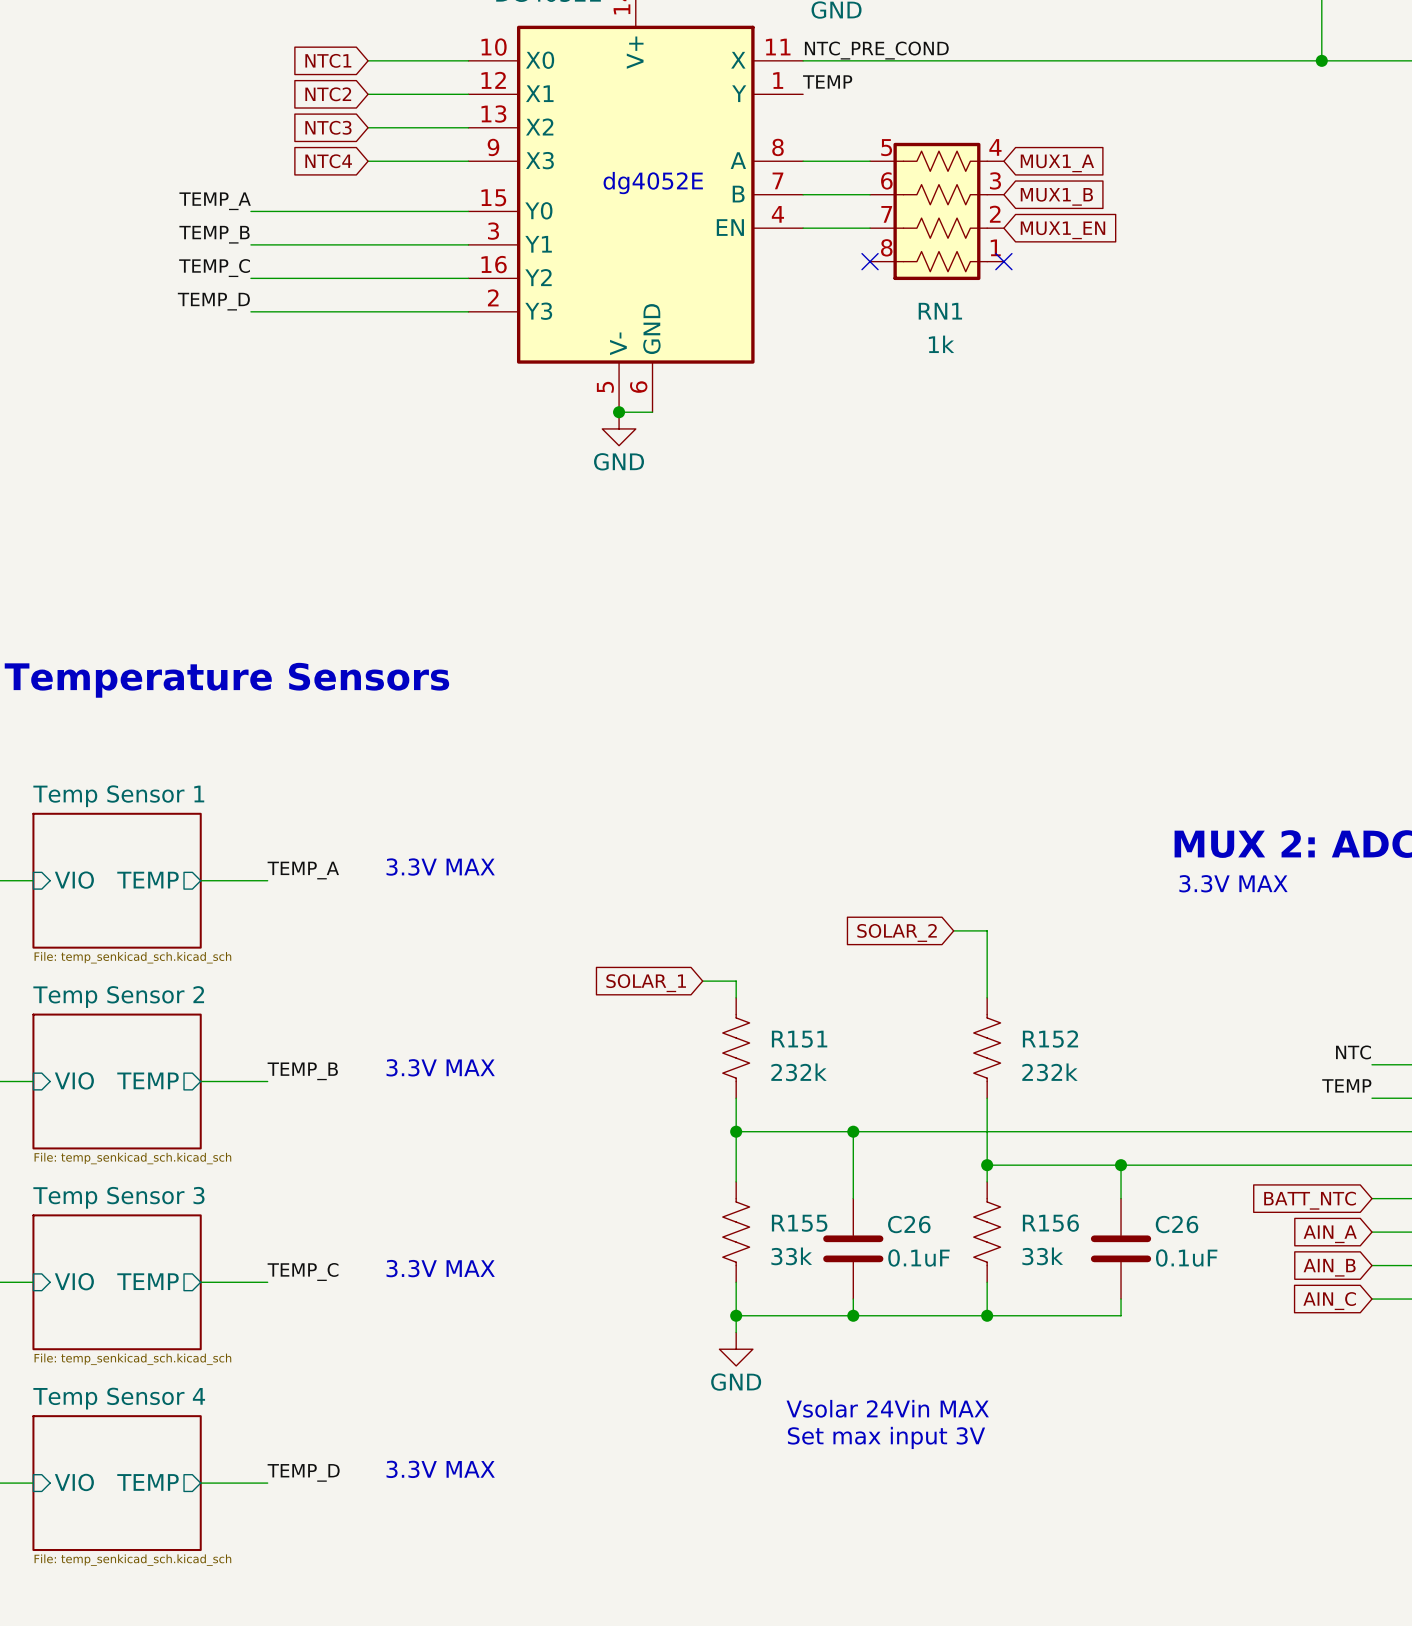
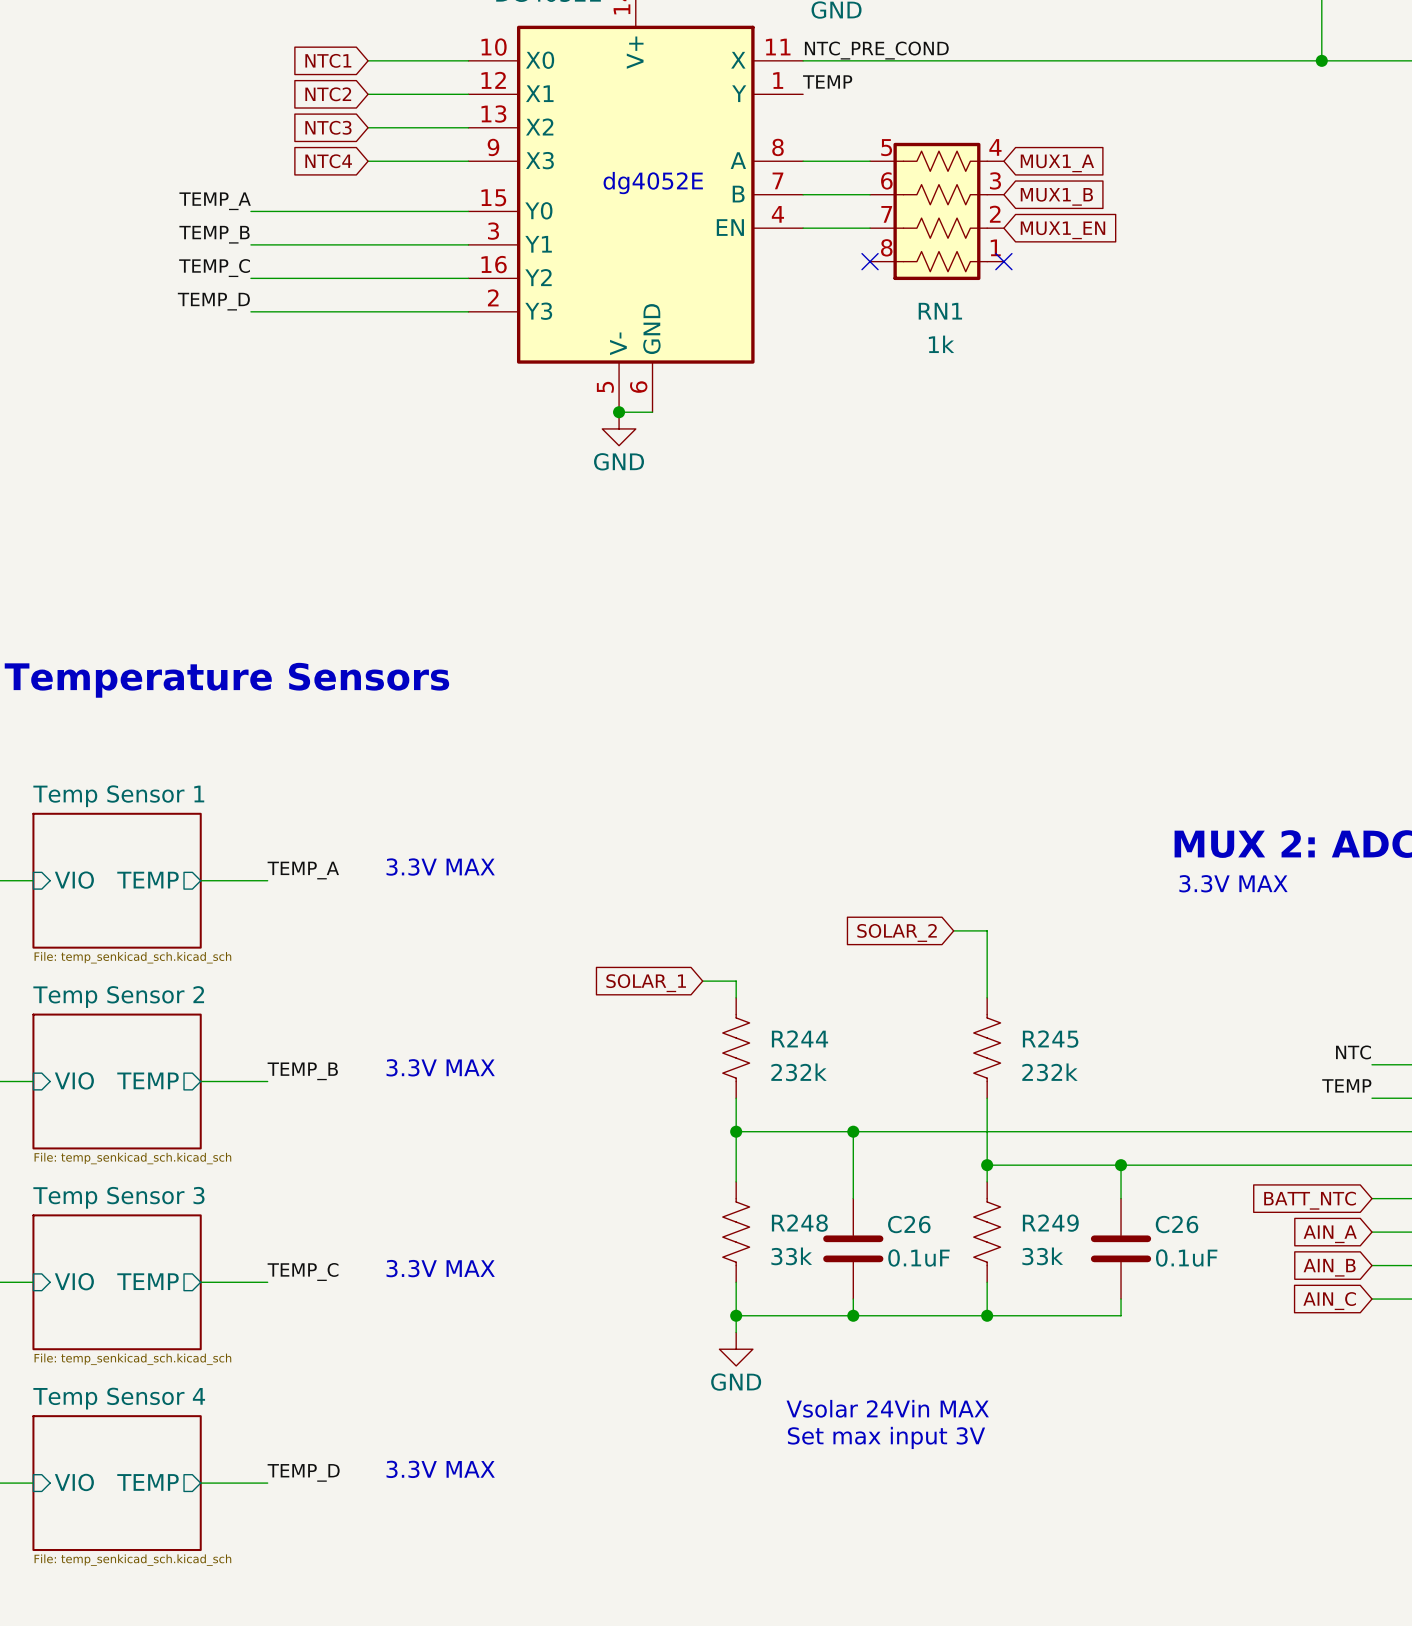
R151 name: R151 (799, 1039) -> R244 (800, 1038)
R152 name: R152 (1050, 1039) -> R245 (1050, 1039)
R155 name: R155 (799, 1223) -> R248 (799, 1223)
R156 name: R156 (1050, 1223) -> R249 (1050, 1223)

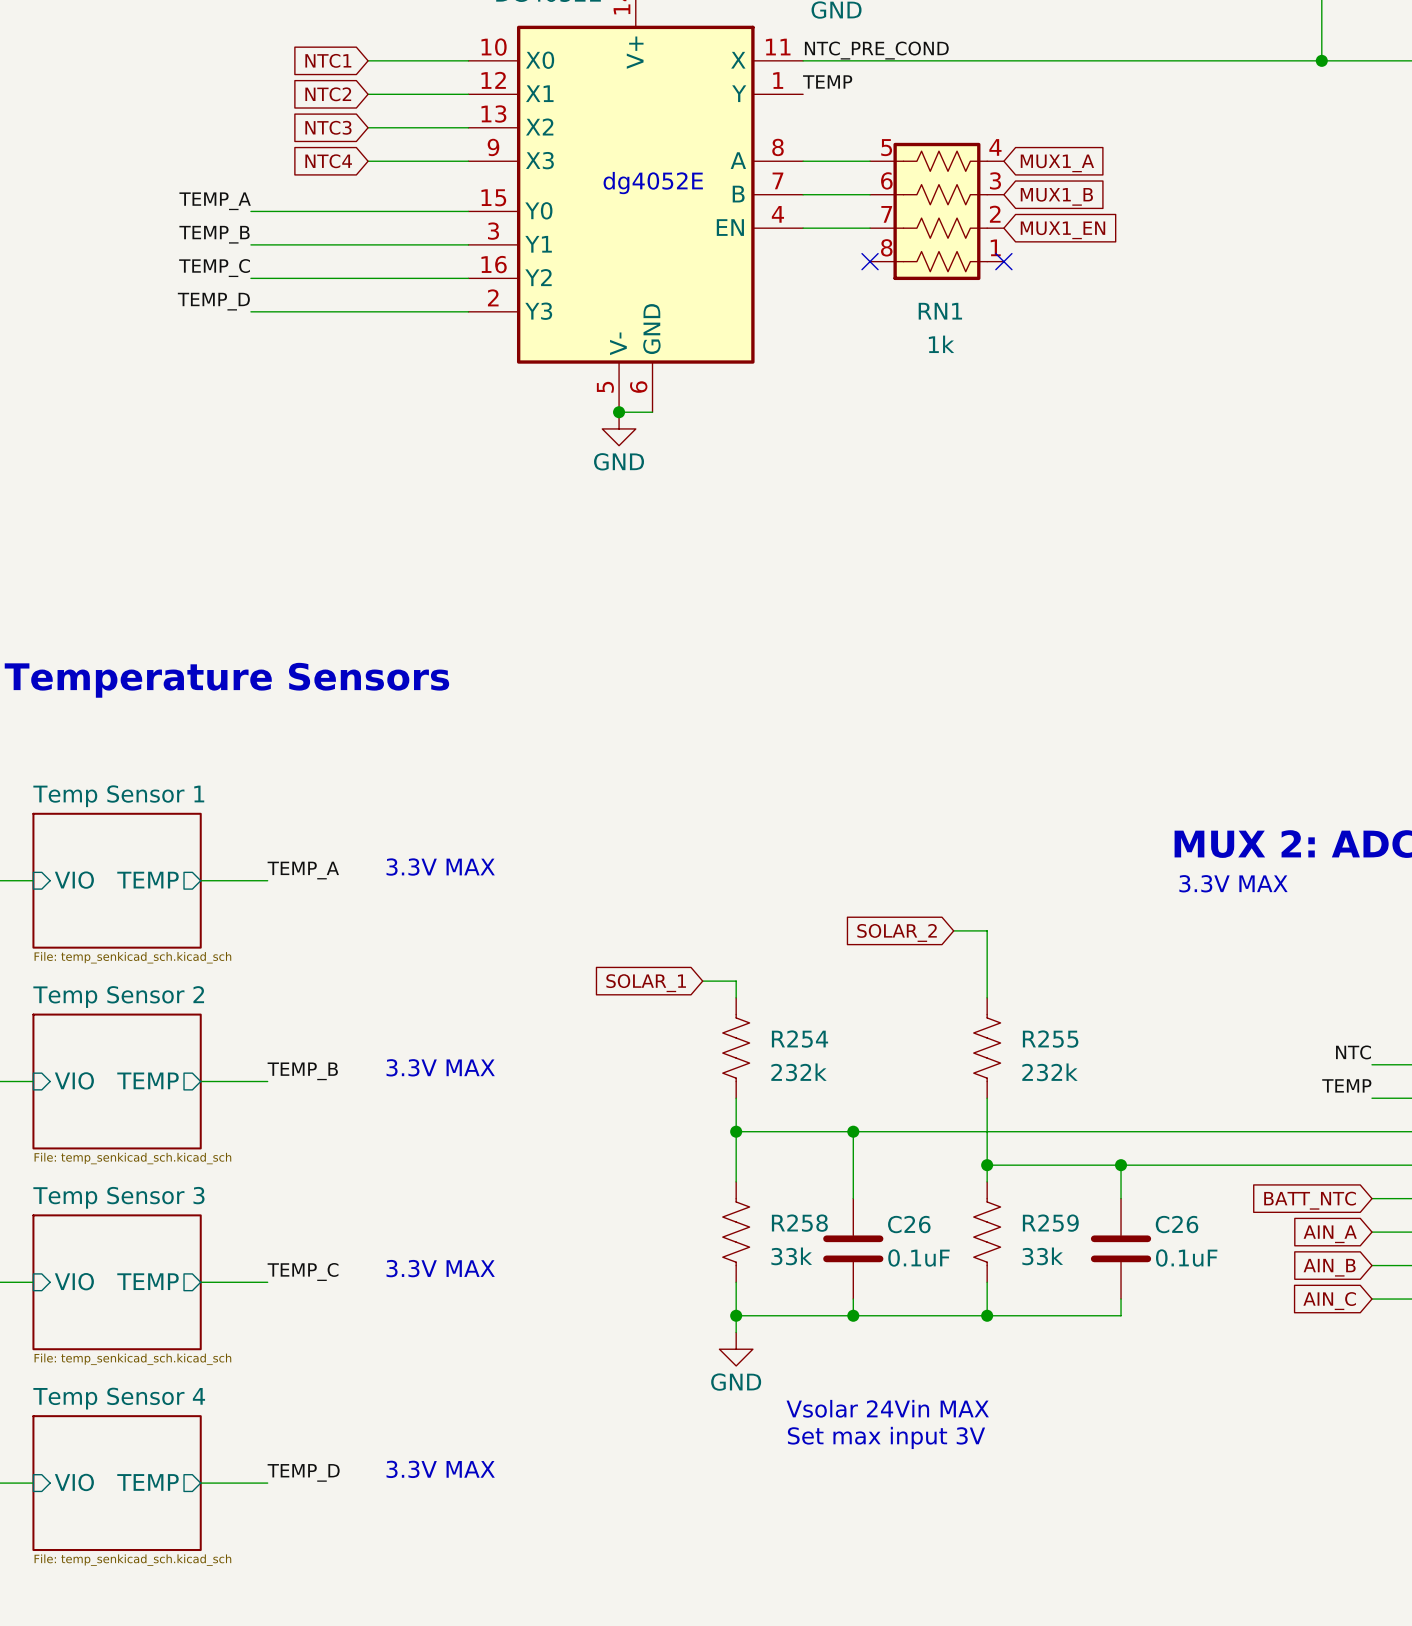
R244 name: R244 (800, 1038) -> R254 (800, 1039)
R245 name: R245 (1050, 1039) -> R255 (1050, 1039)
R248 name: R248 (799, 1223) -> R258 (799, 1223)
R249 name: R249 (1050, 1223) -> R259 (1050, 1223)

